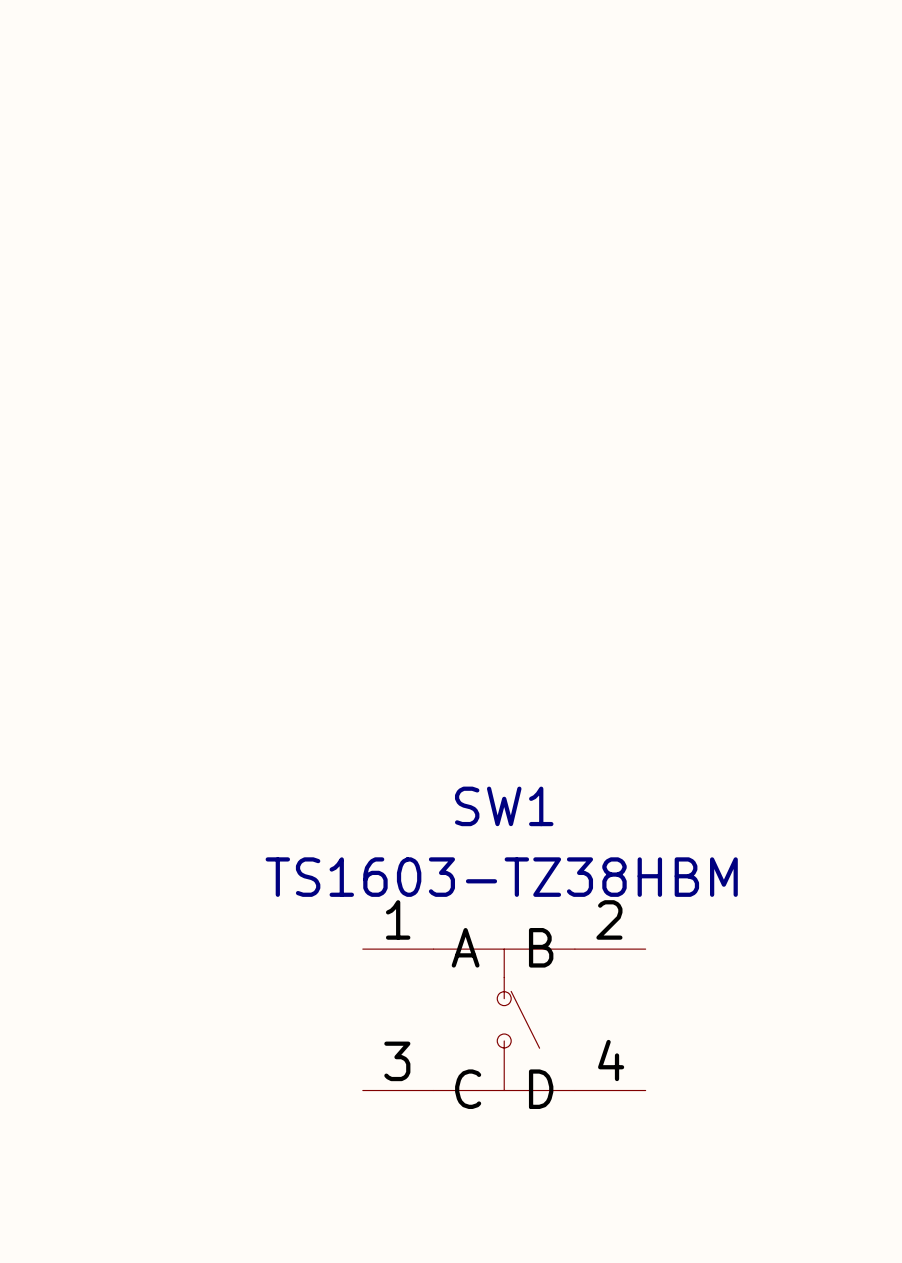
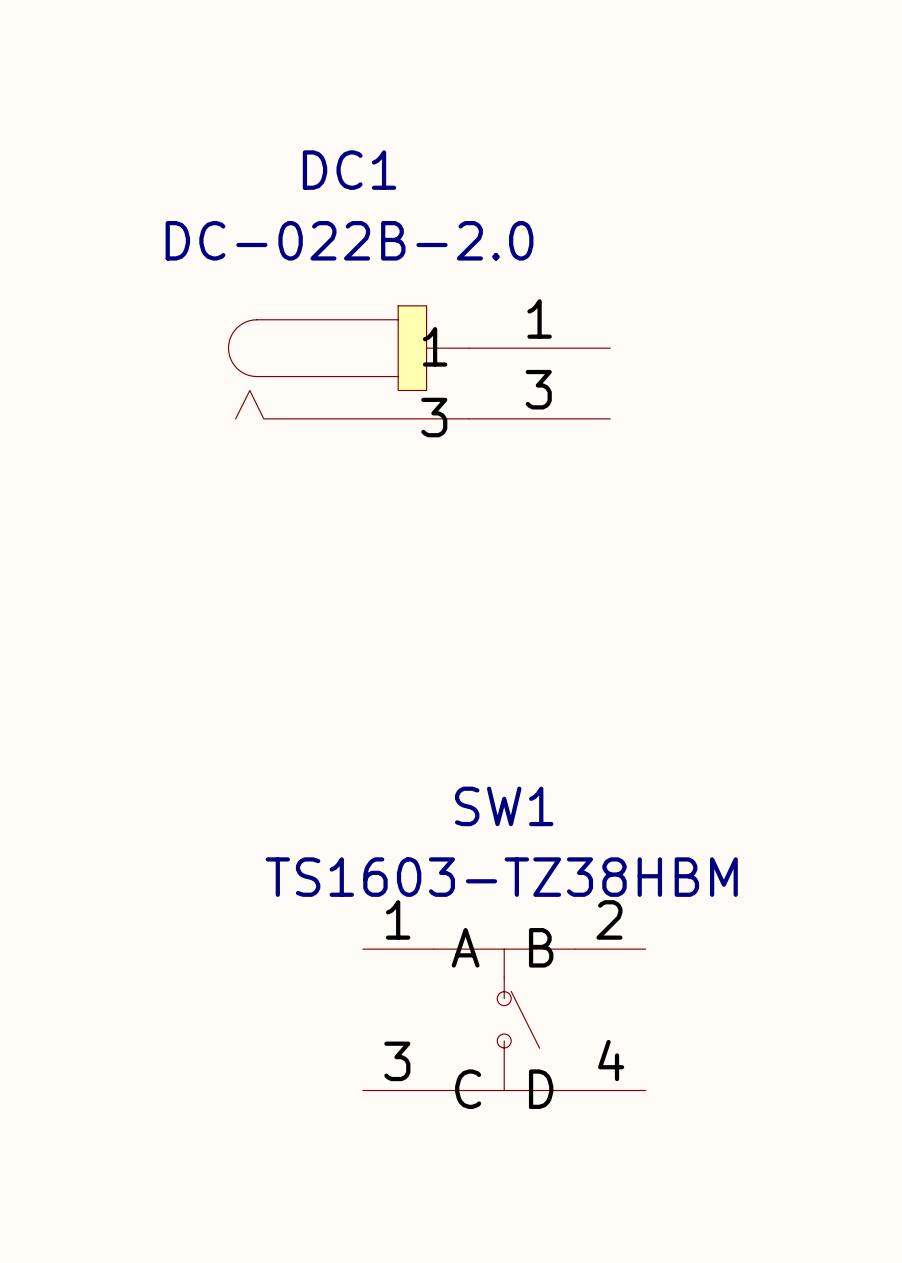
DC1: none -> DC-022B-2.0 (419, 362)

